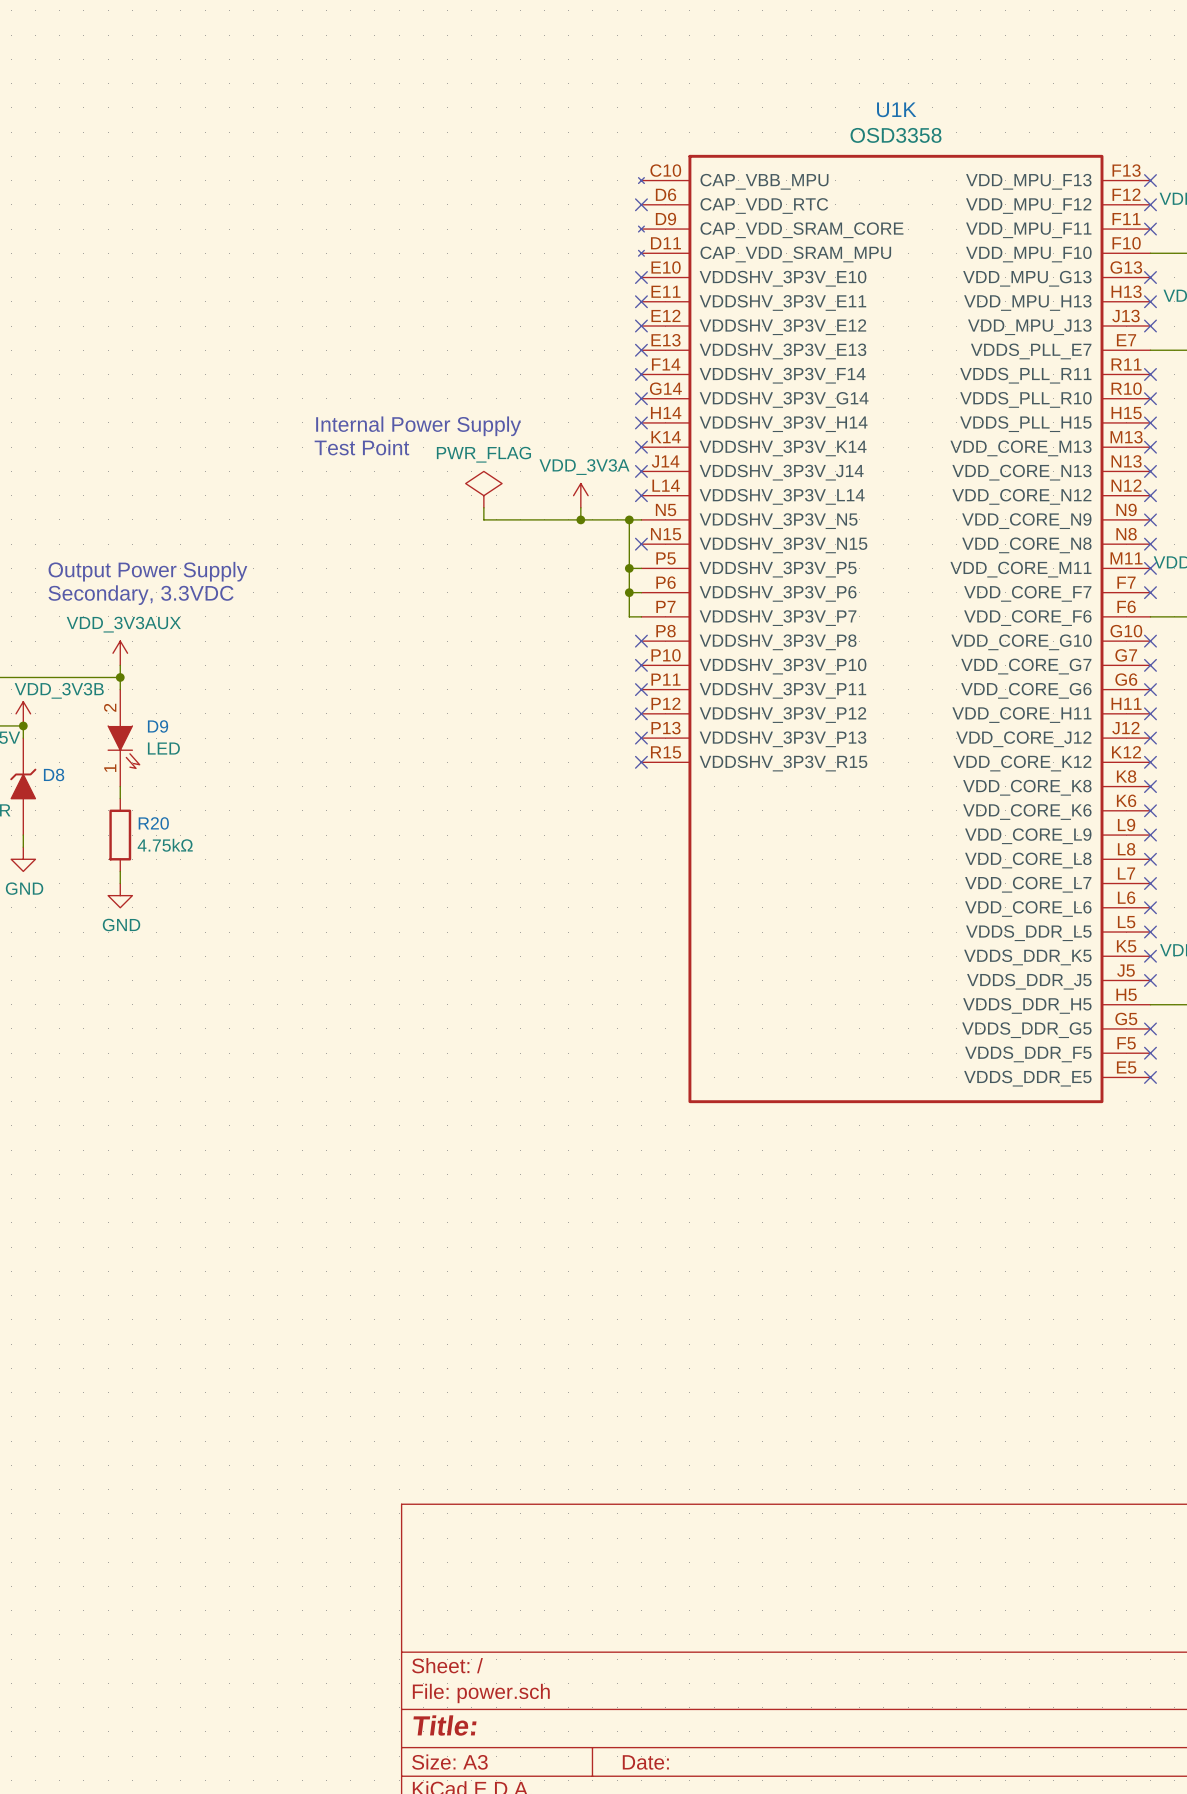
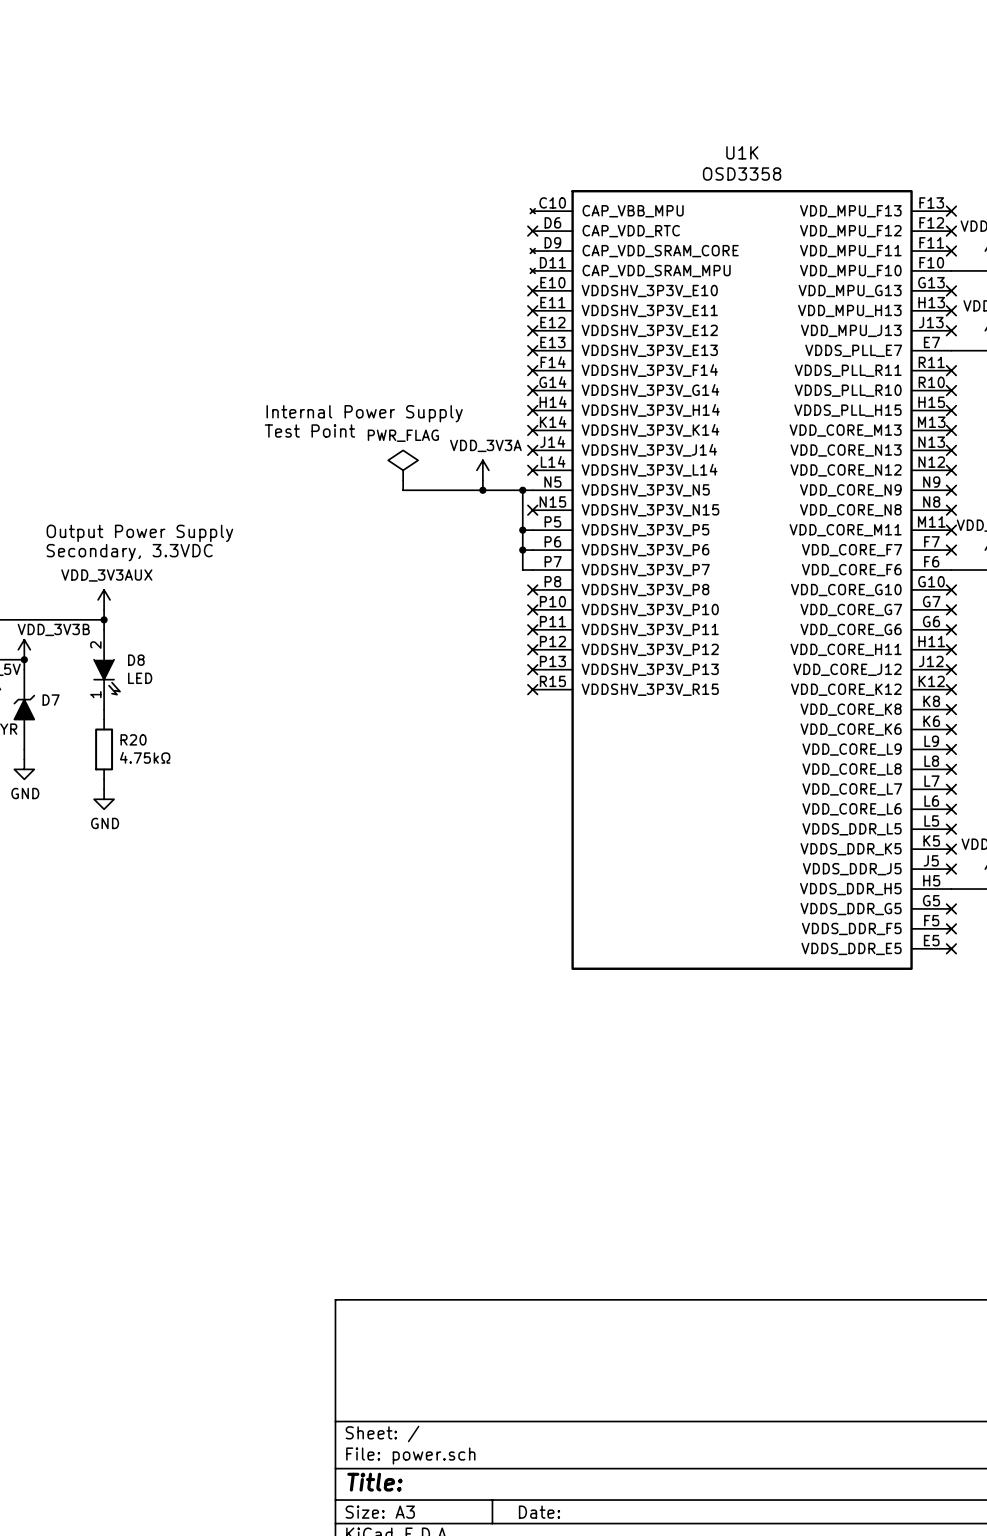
D9 name: D9 (158, 726) -> D8 (136, 660)
D8 name: D8 (54, 774) -> D7 (51, 700)

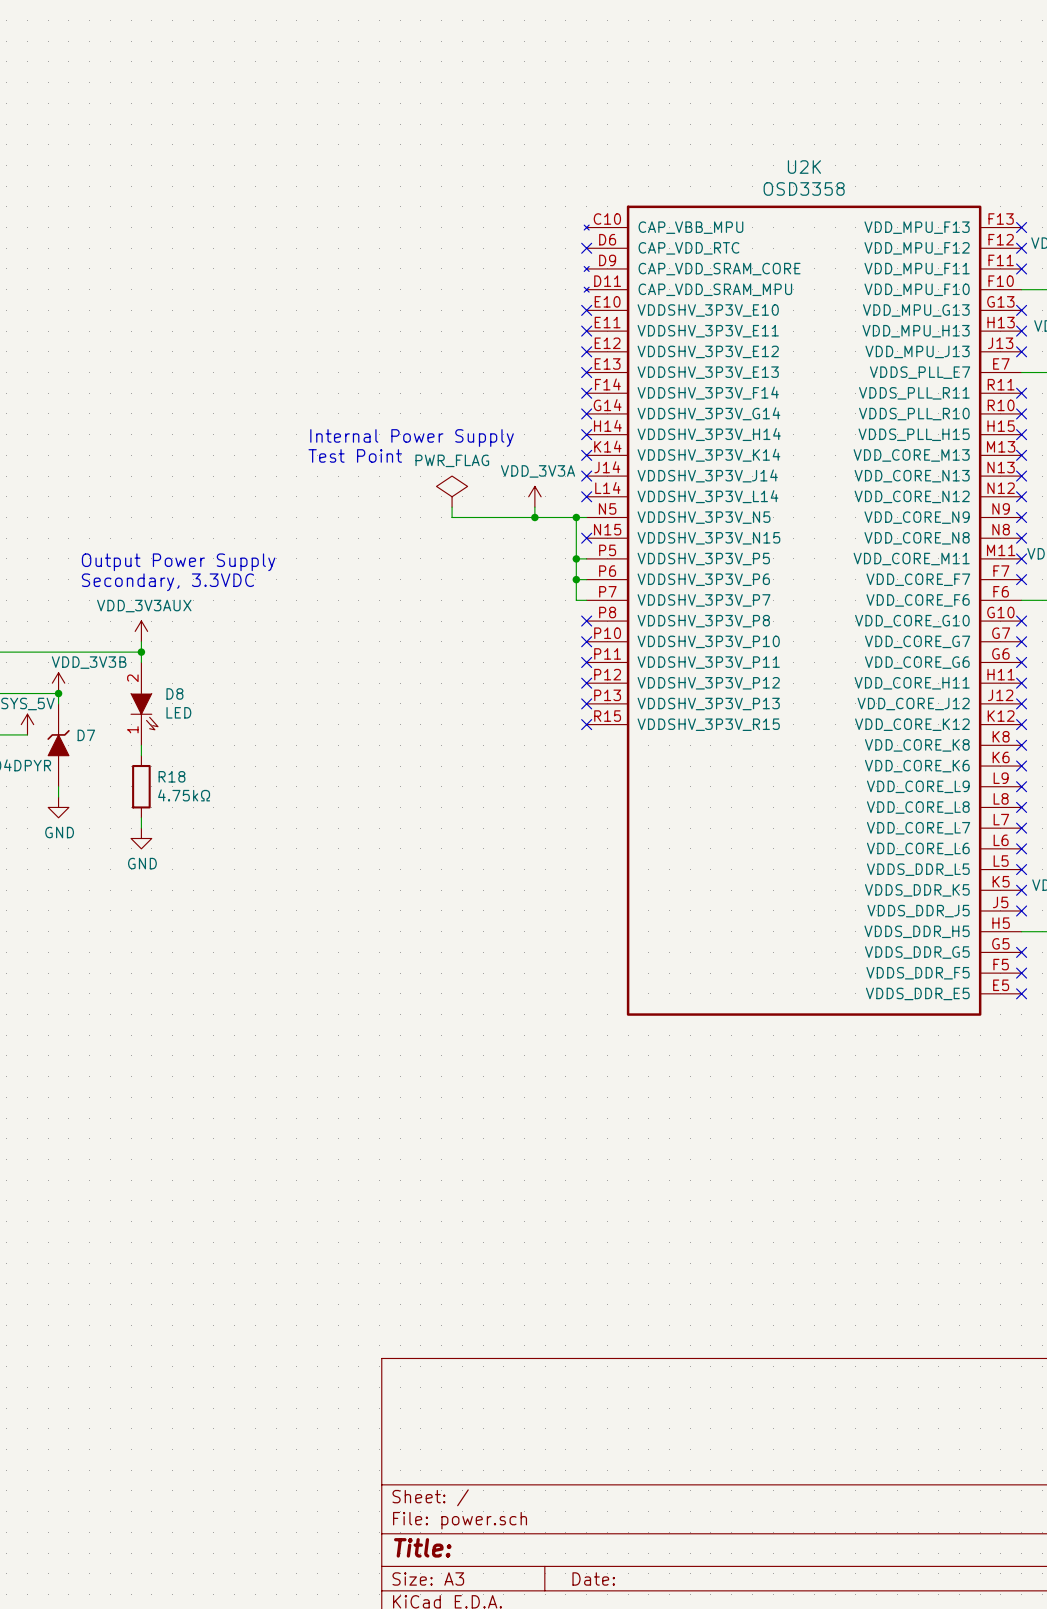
U1K name: U1K (742, 152) -> U2K (804, 167)
R20 name: R20 (133, 739) -> R18 (172, 776)

